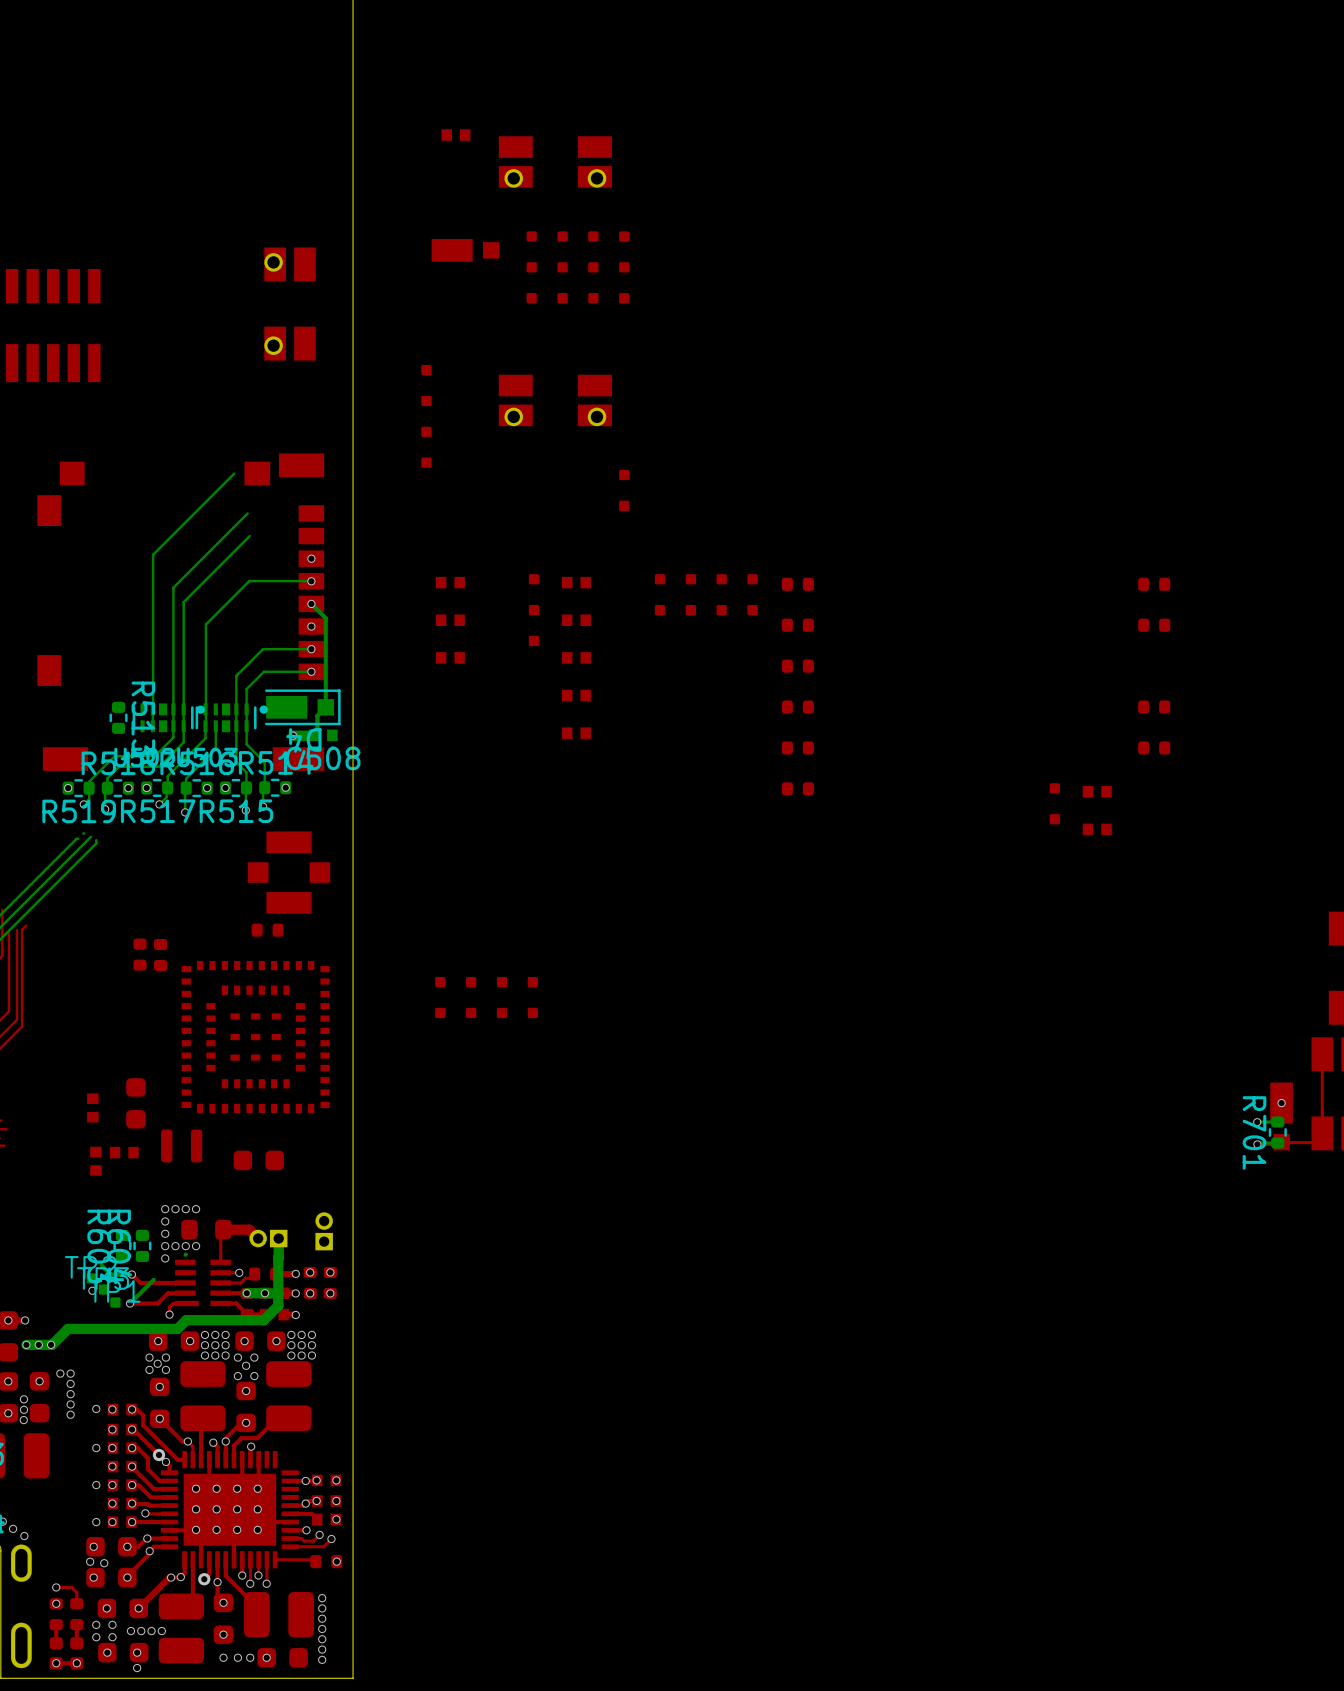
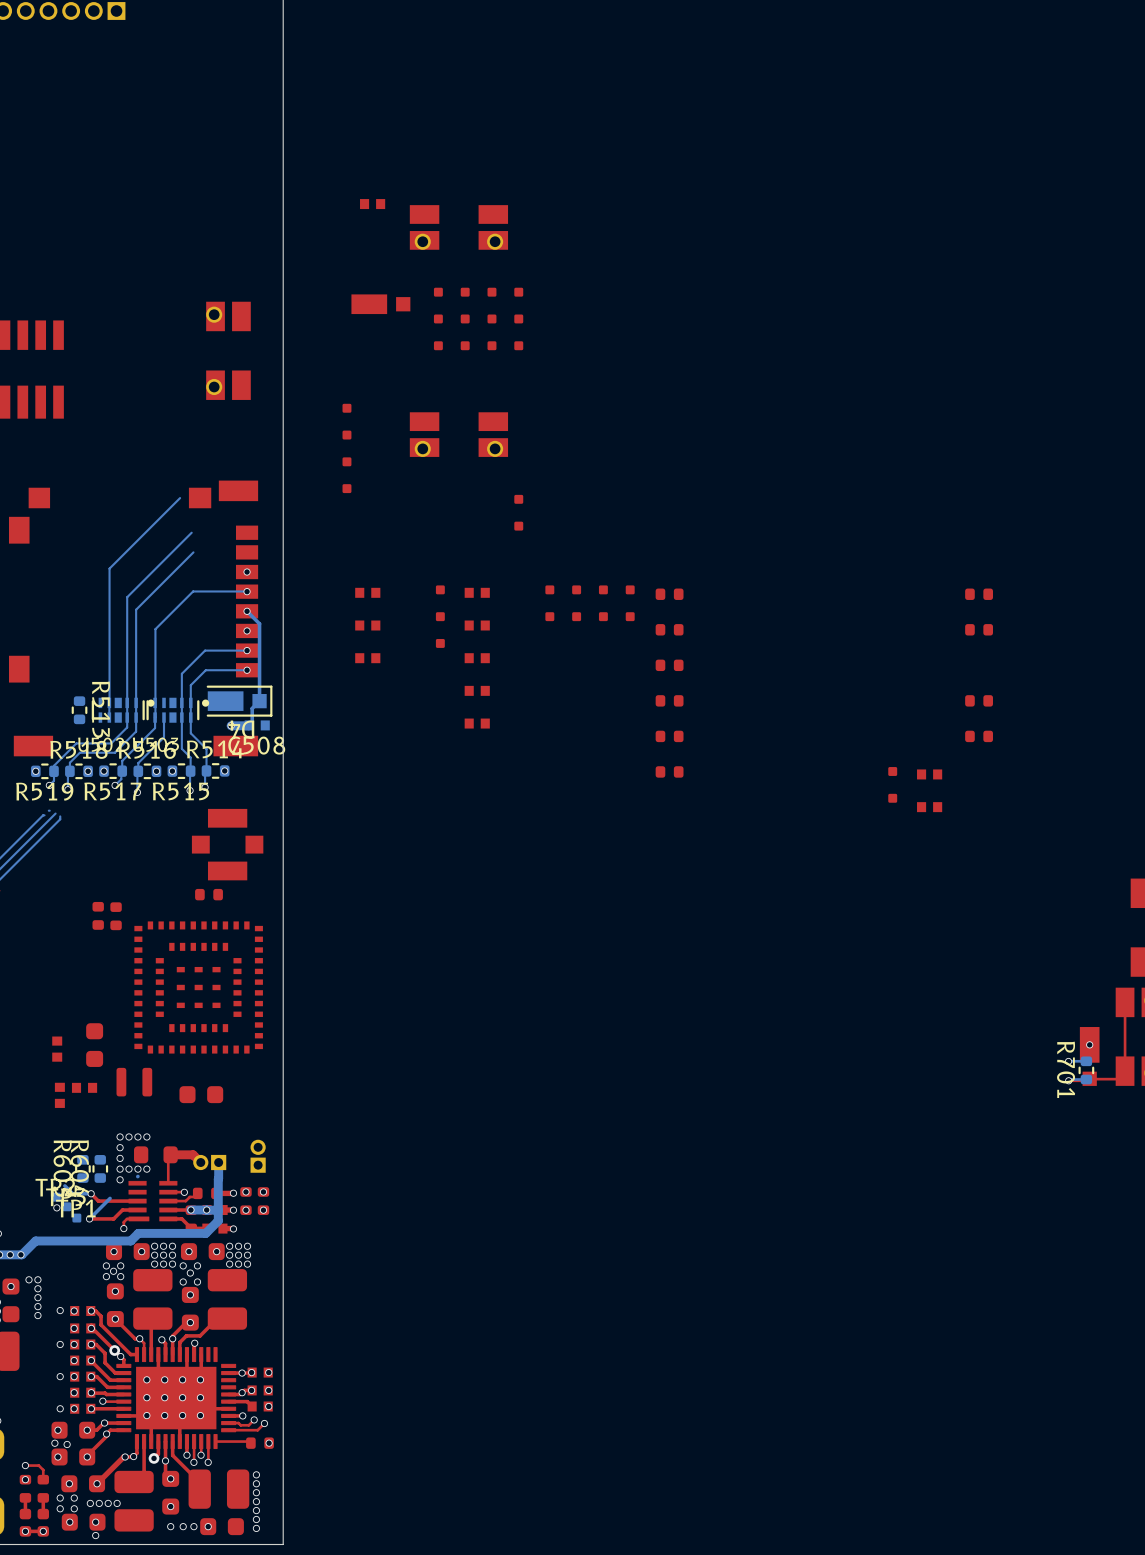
part: (440, 982) -> none
part: (471, 982) -> none
part: (502, 982) -> none
part: (532, 982) -> none
part: (440, 1012) -> none
part: (471, 1012) -> none
part: (502, 1012) -> none
part: (532, 1012) -> none

